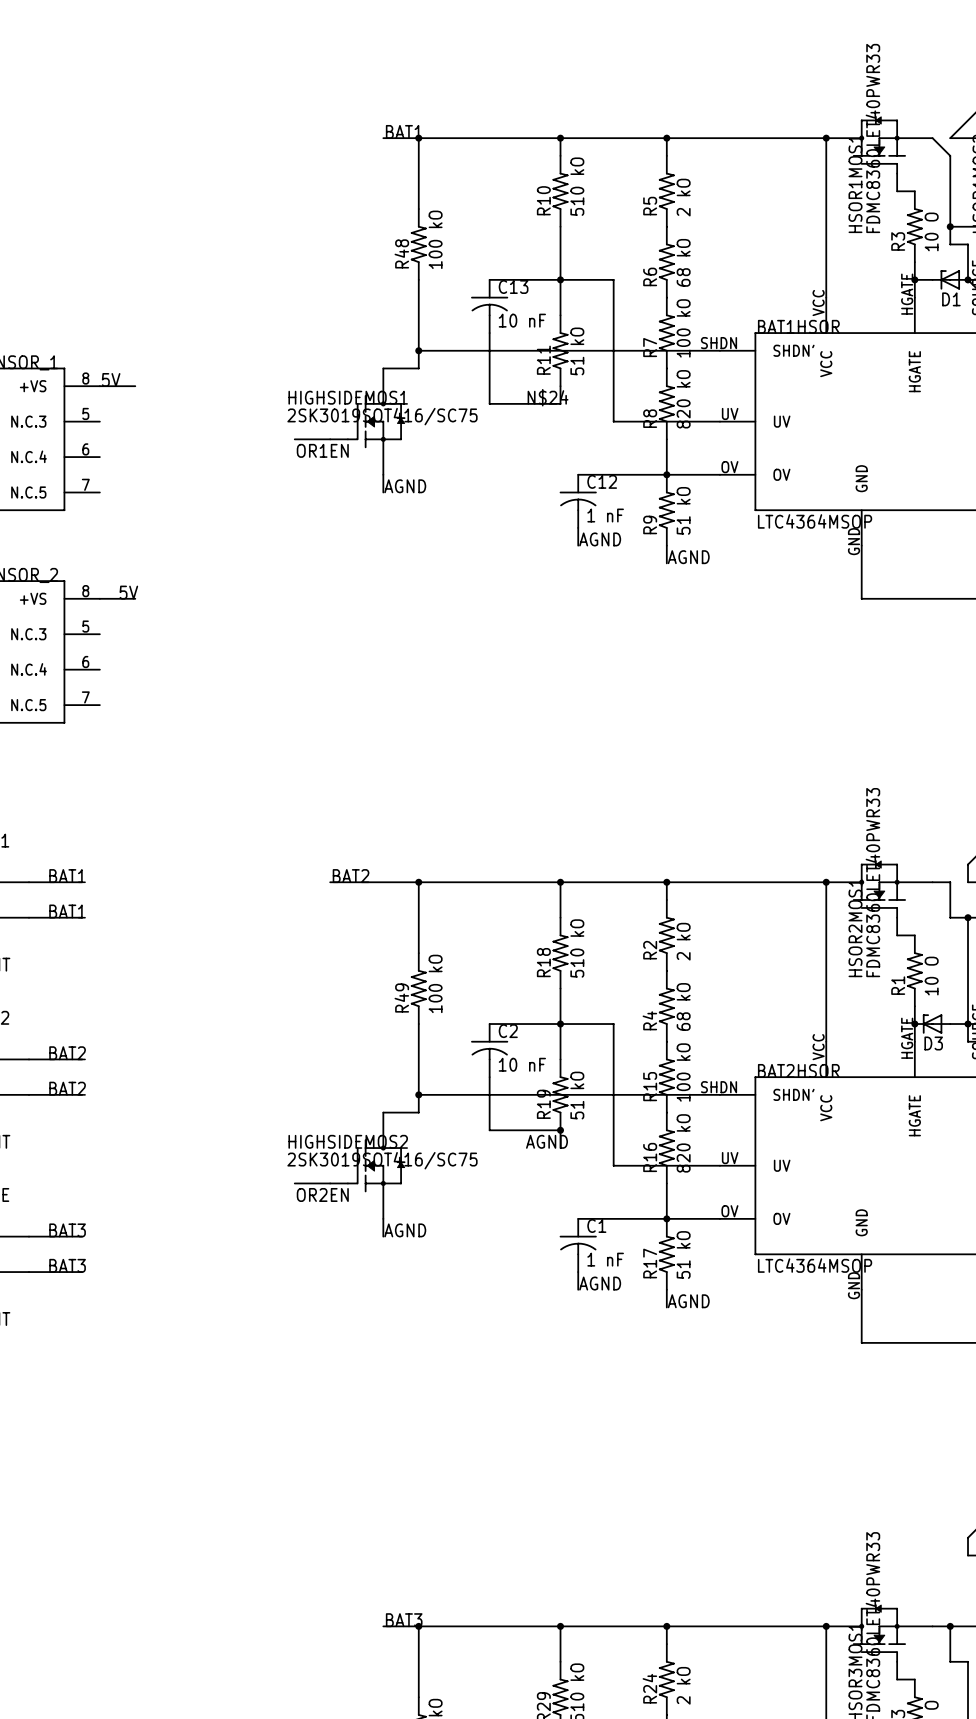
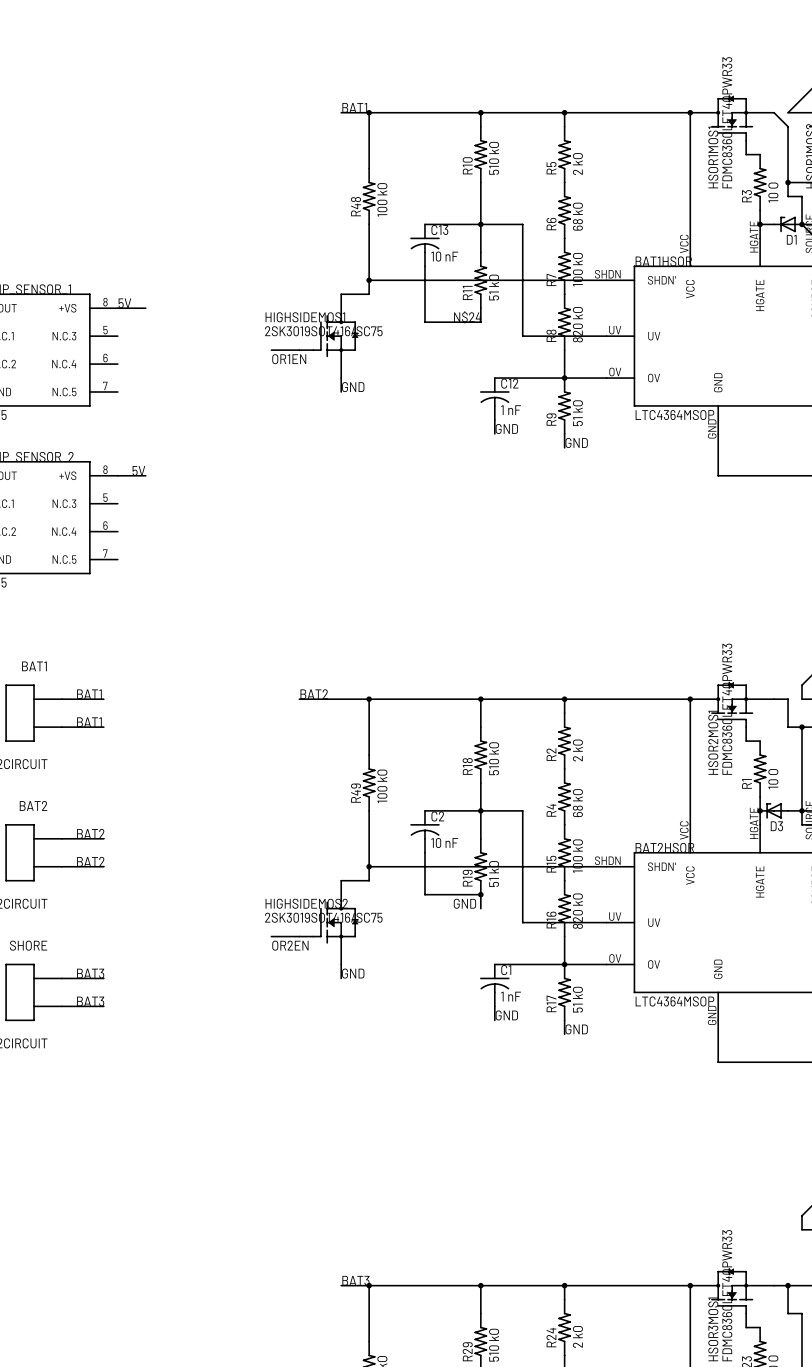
label: AGND (405, 486) -> GND (353, 387)
label: AGND (600, 539) -> GND (506, 429)
label: AGND (688, 557) -> GND (576, 442)
label: AGND (546, 1141) -> GND (464, 903)
label: AGND (405, 1230) -> GND (353, 973)
label: AGND (600, 1283) -> GND (506, 1015)
label: AGND (688, 1301) -> GND (576, 1029)

